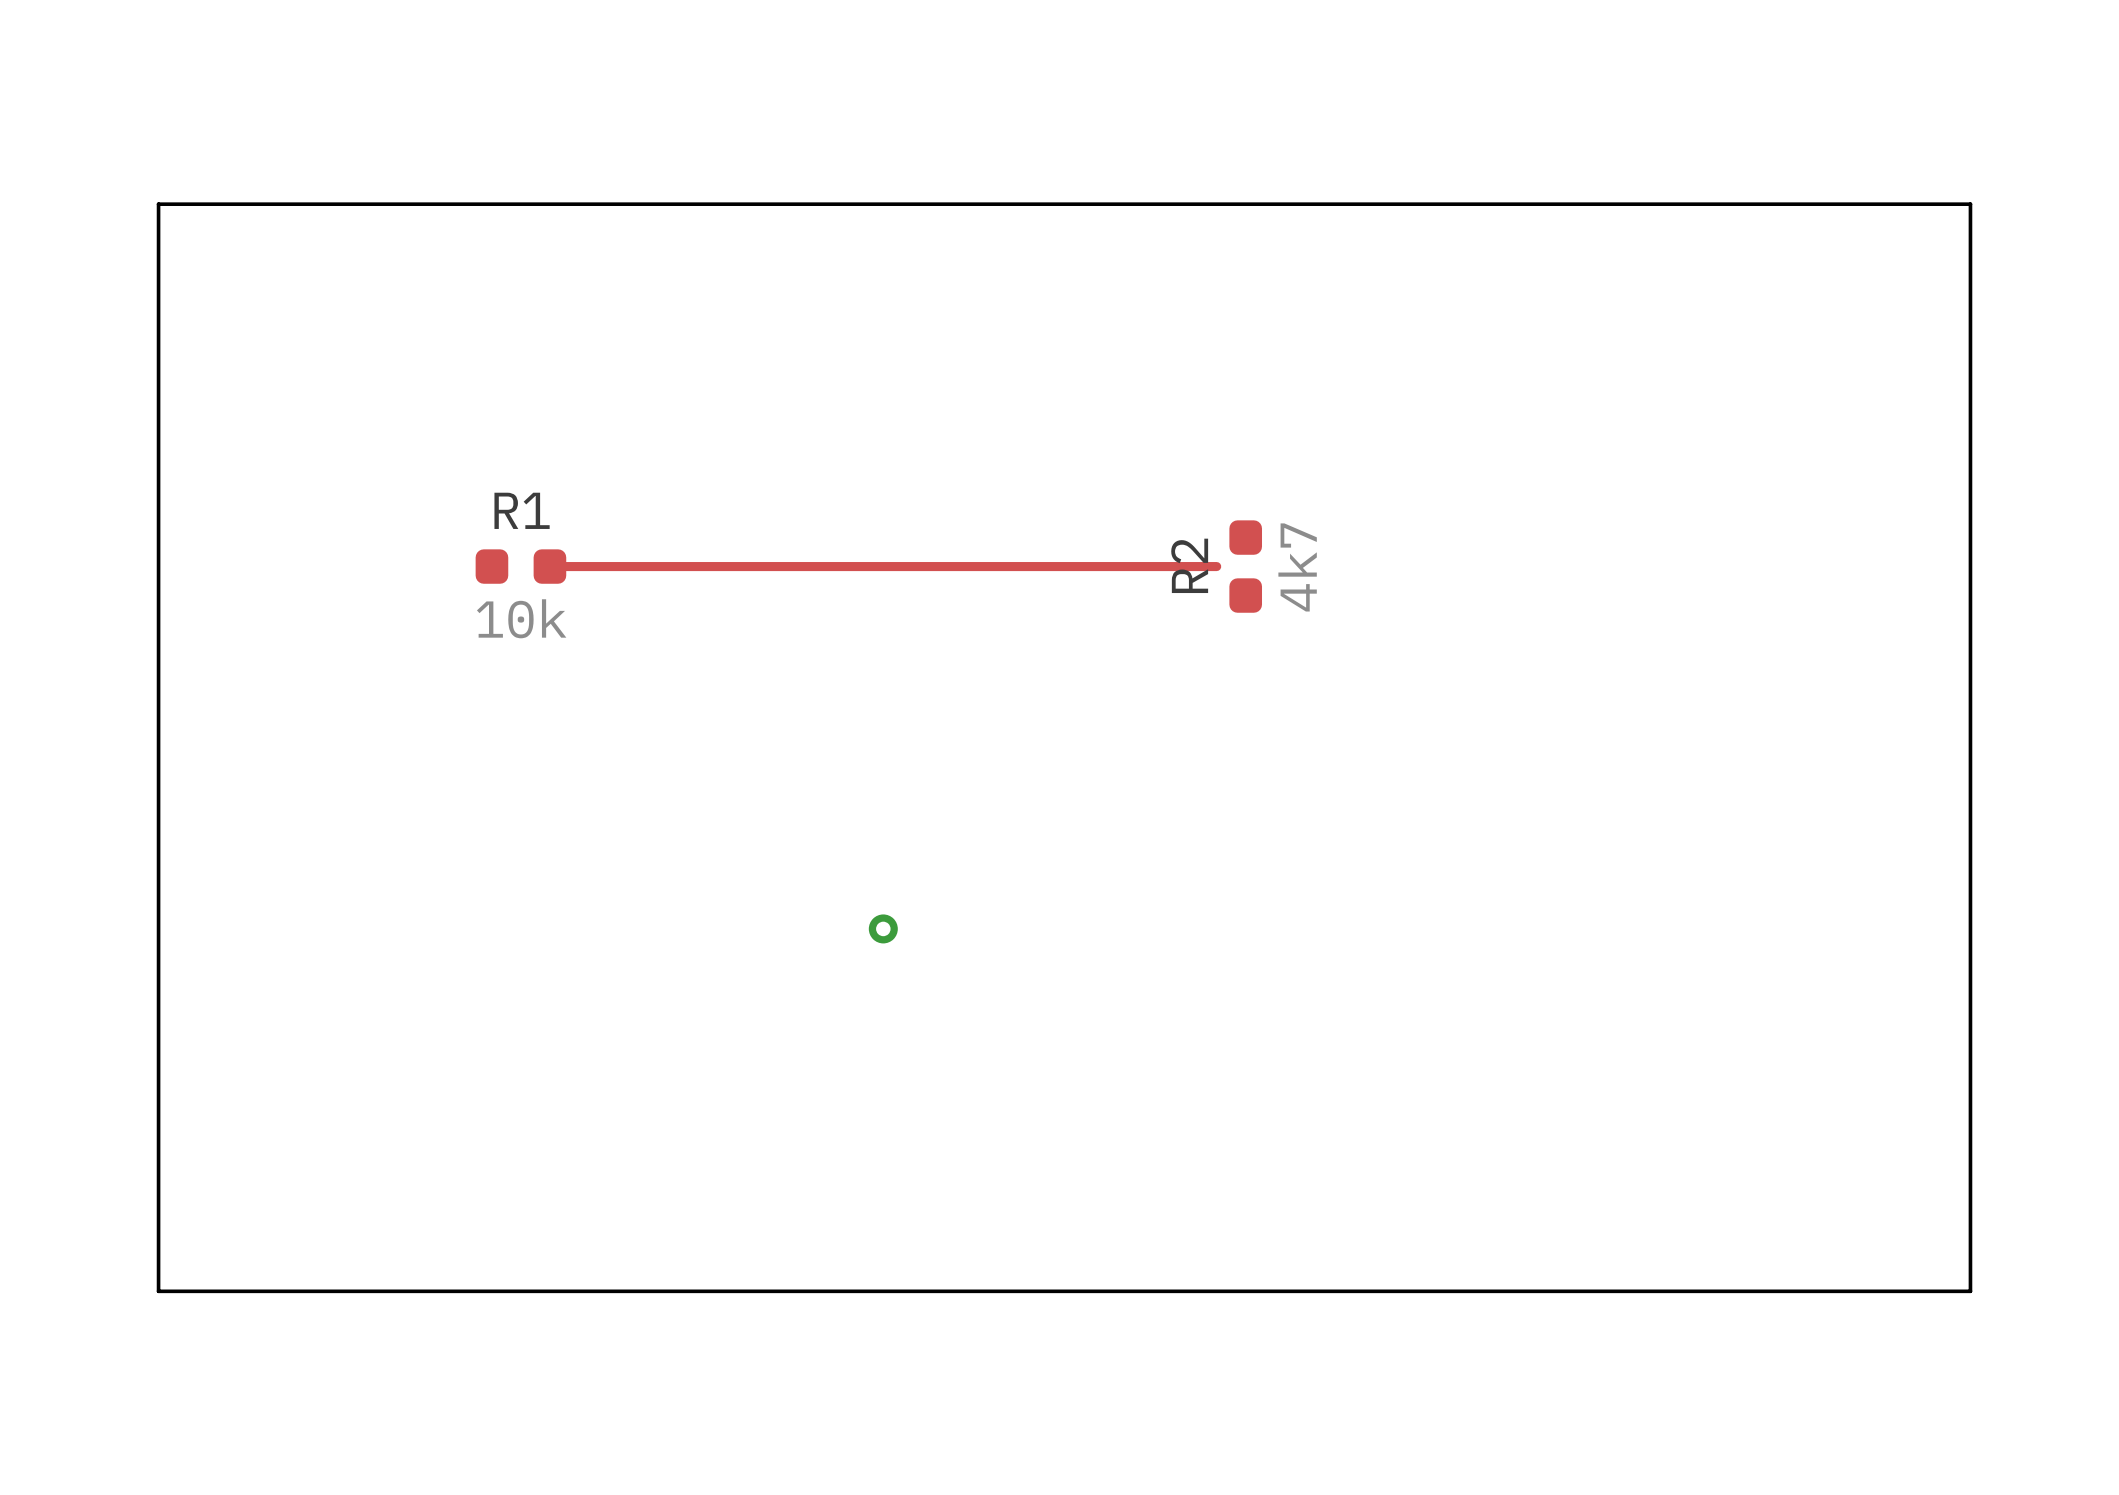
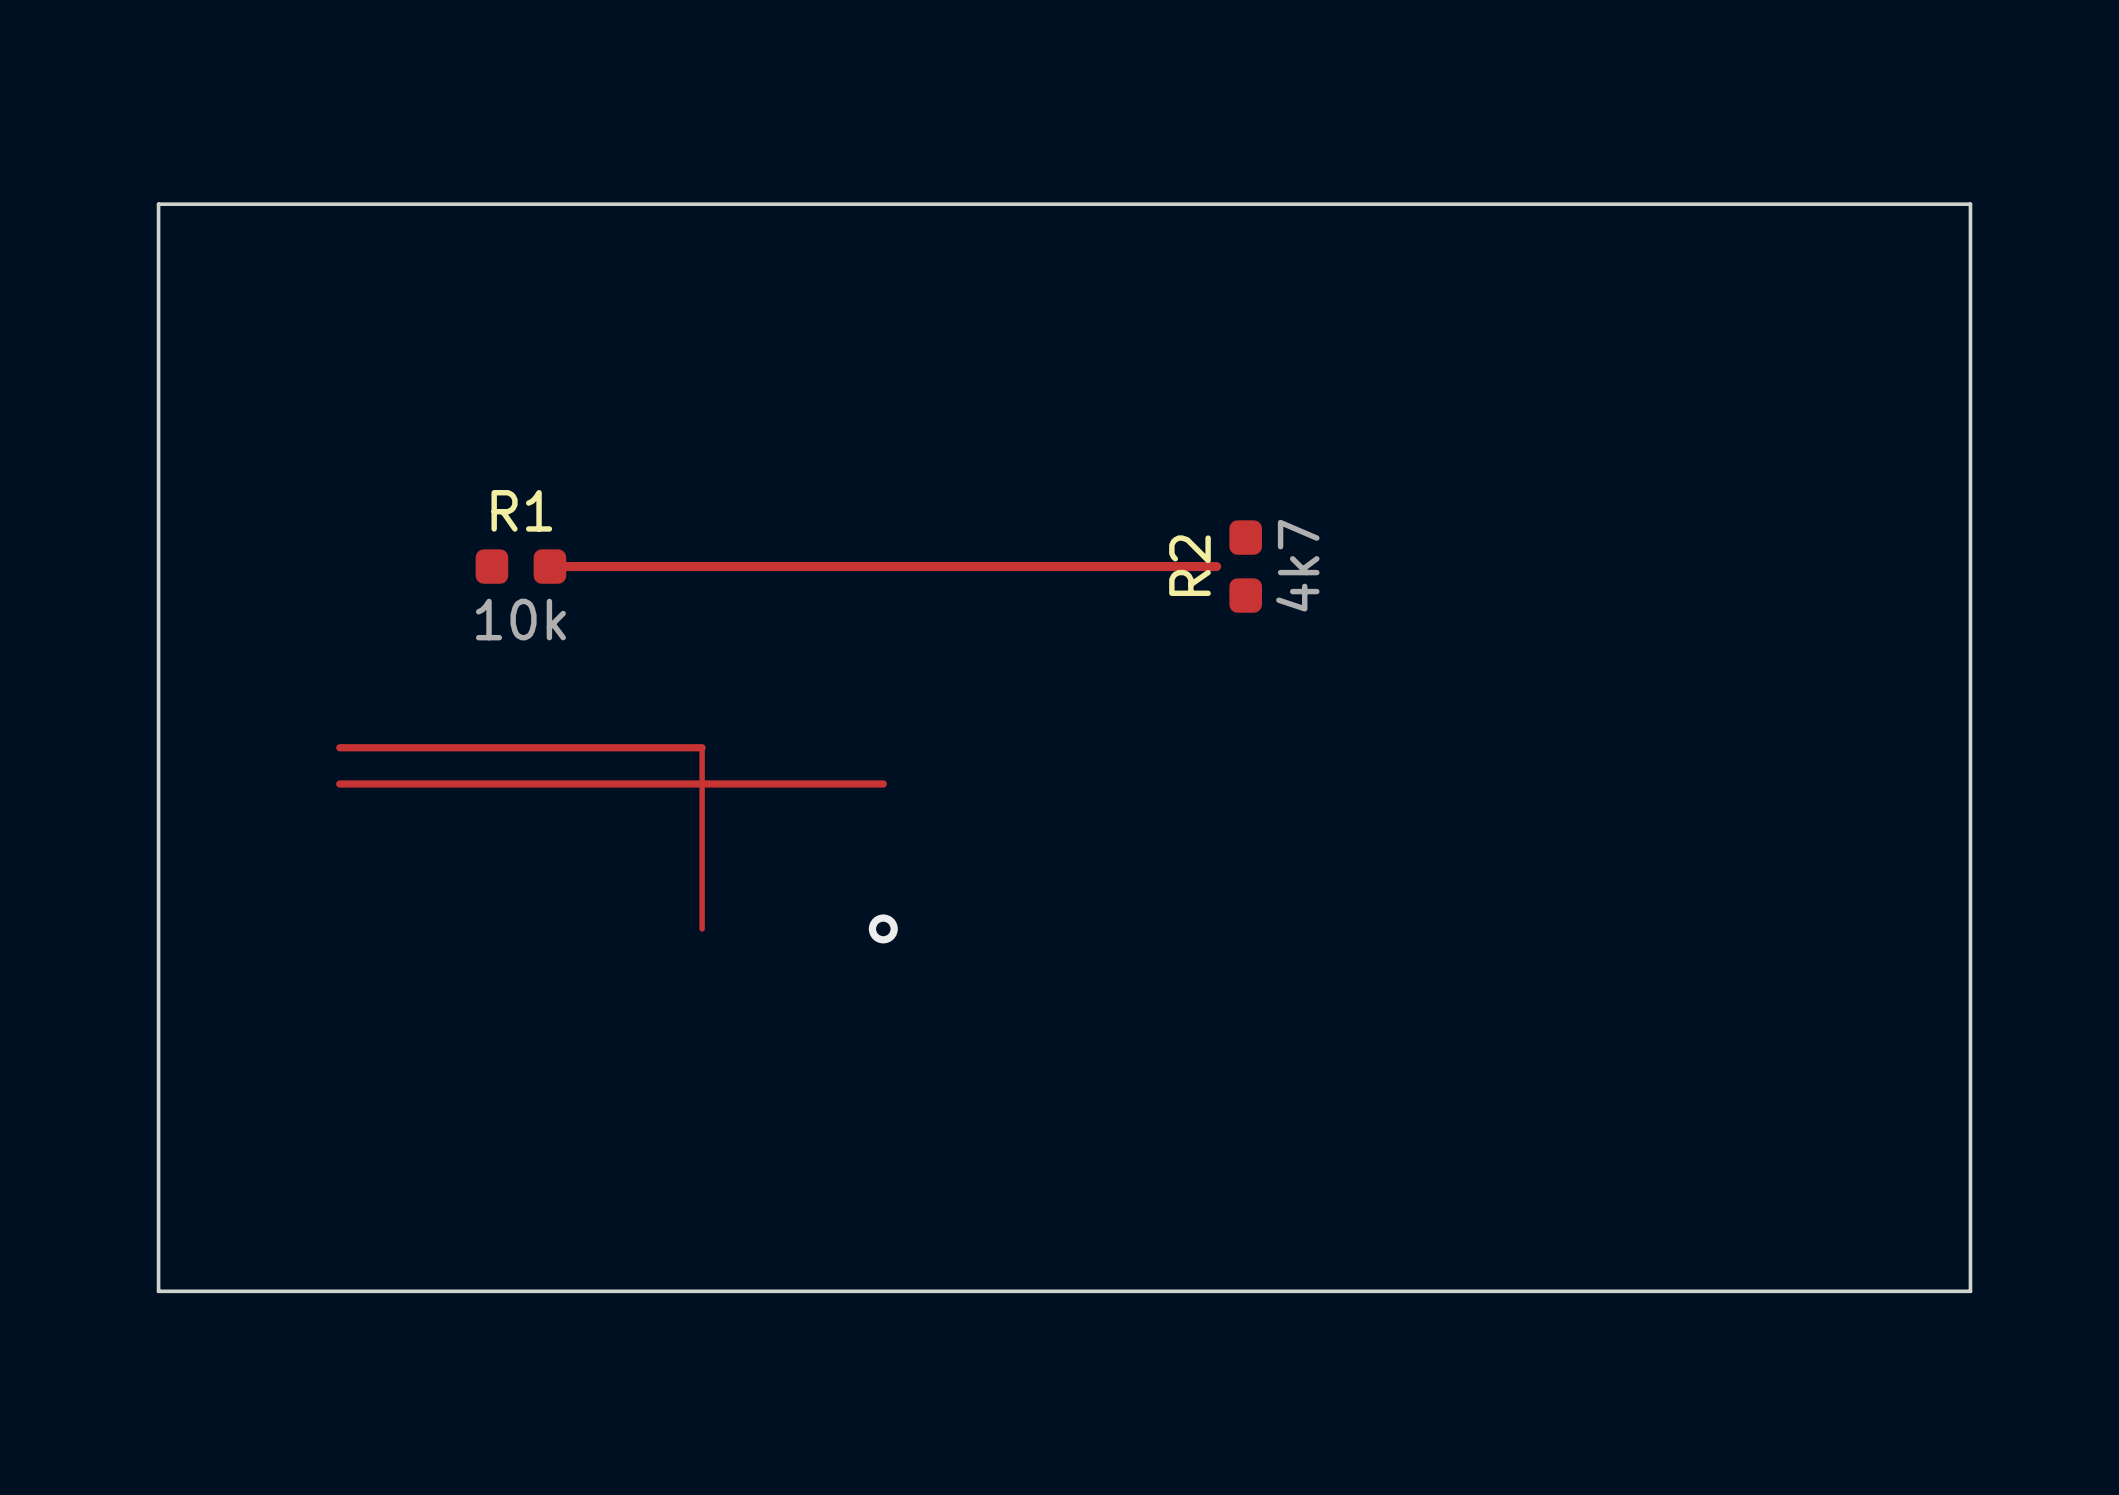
track: none -> (339, 747) (702, 747) (702, 928)
track: none -> (339, 783) (883, 783)

